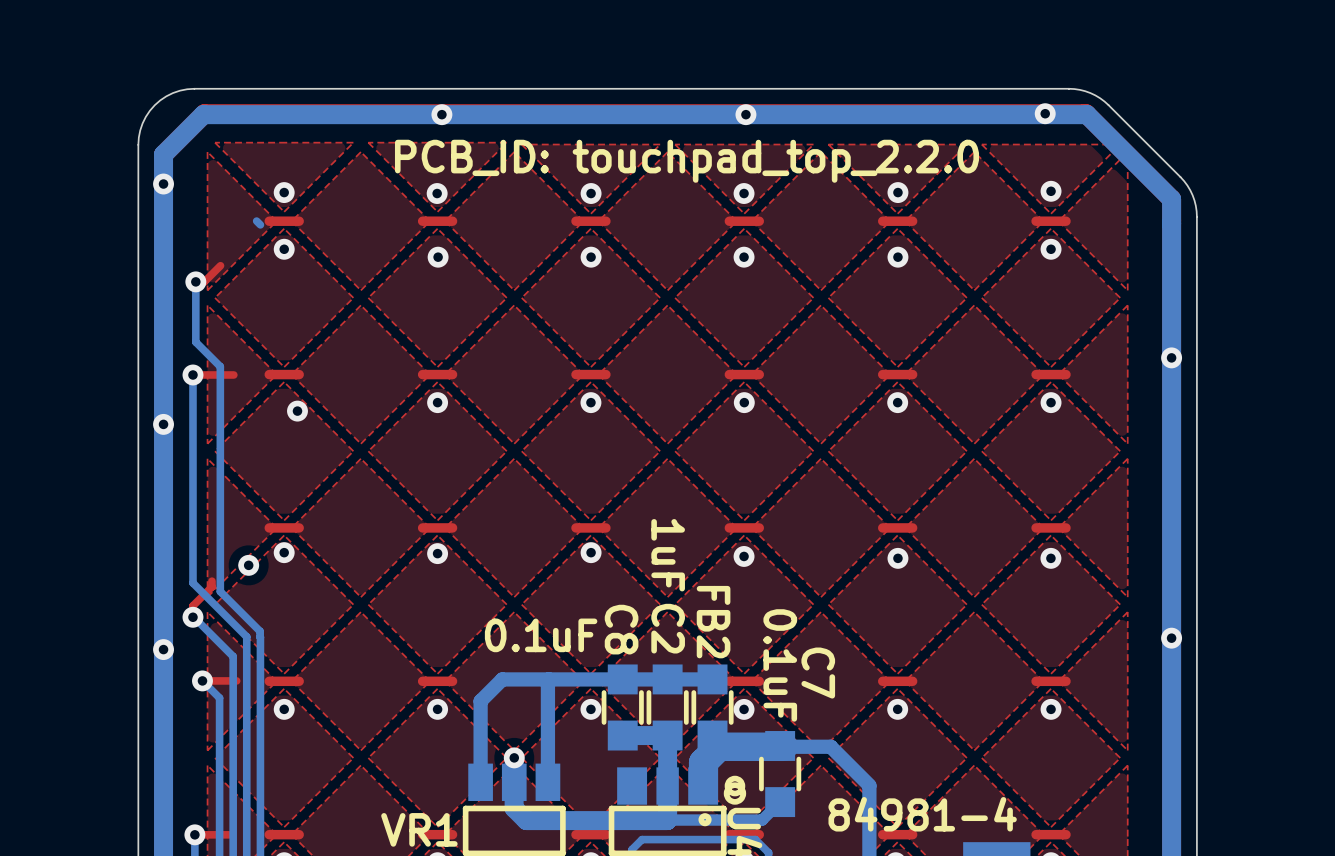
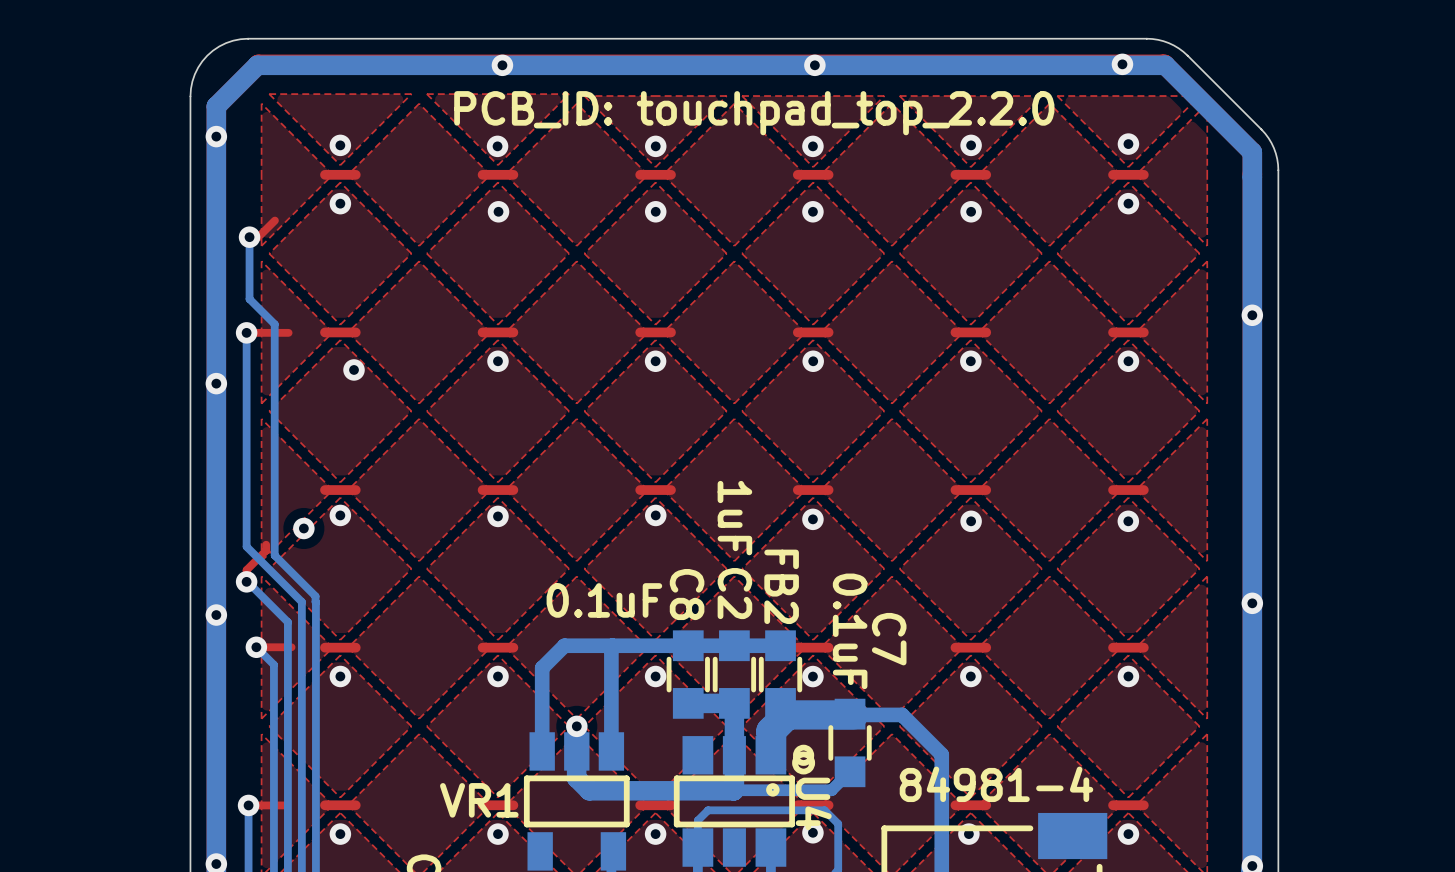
bottom track: (256, 221) (260, 224) -> none

